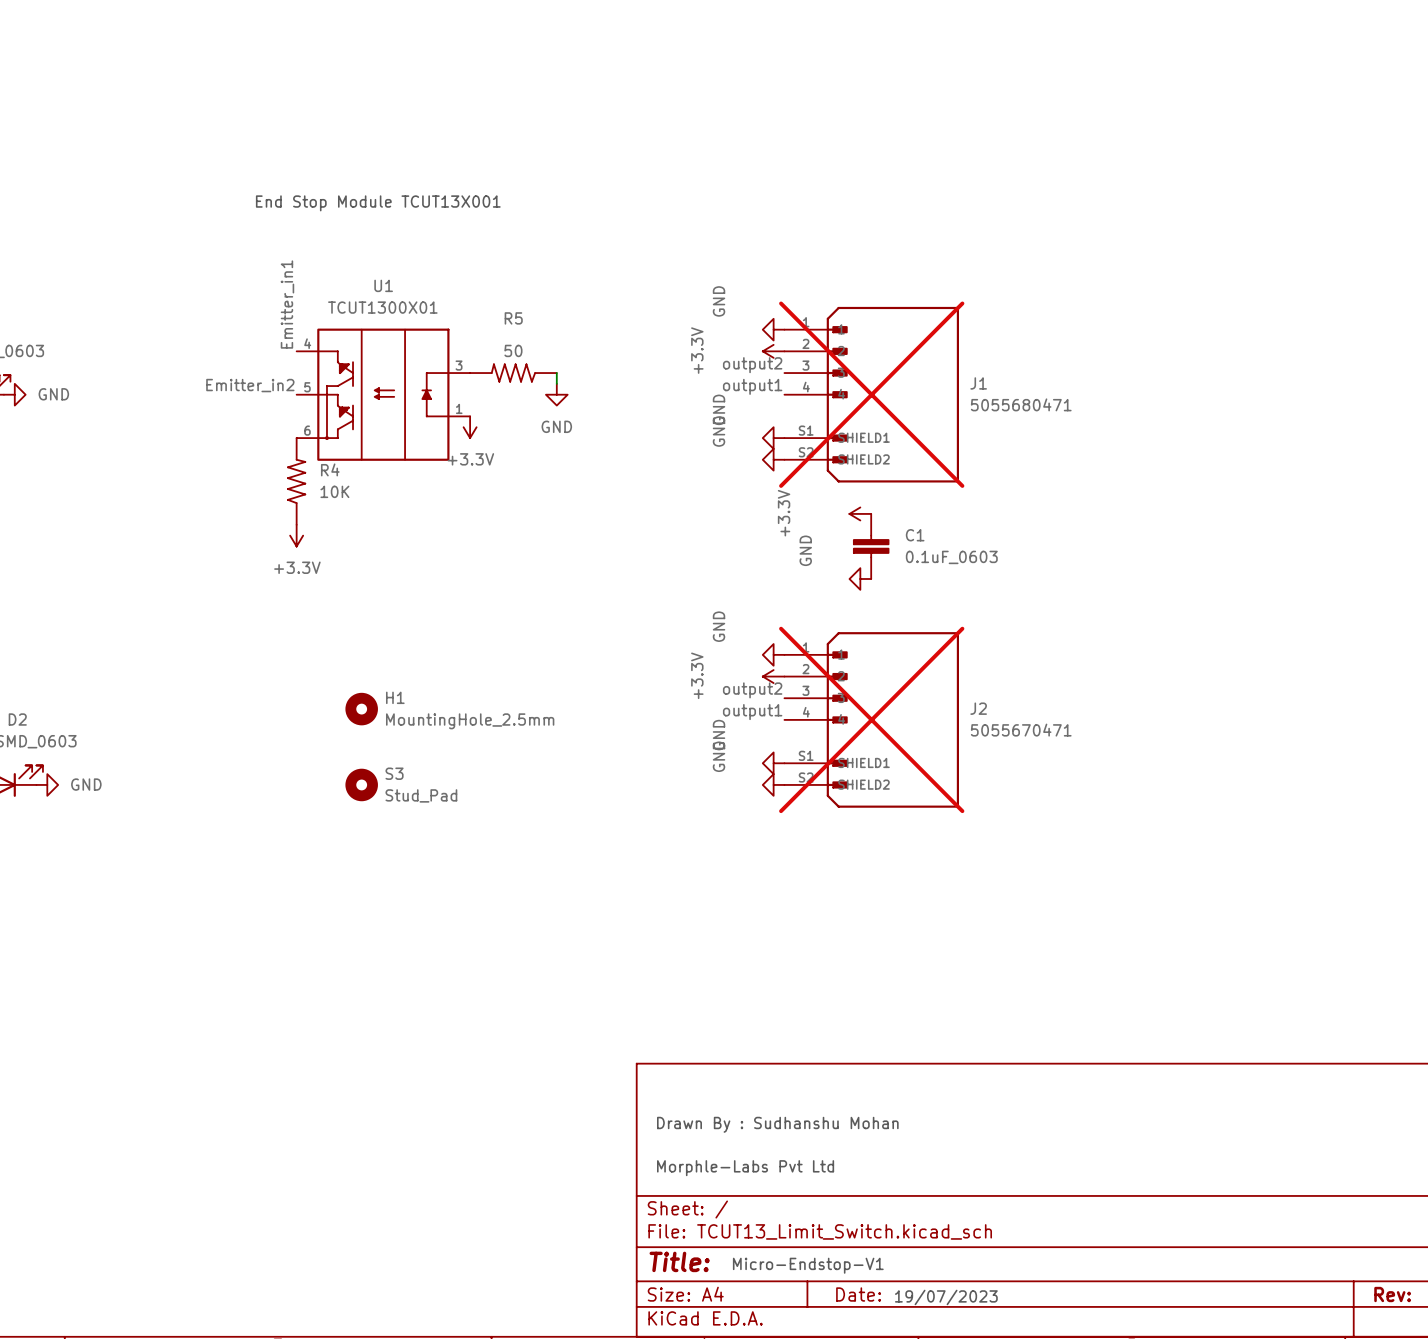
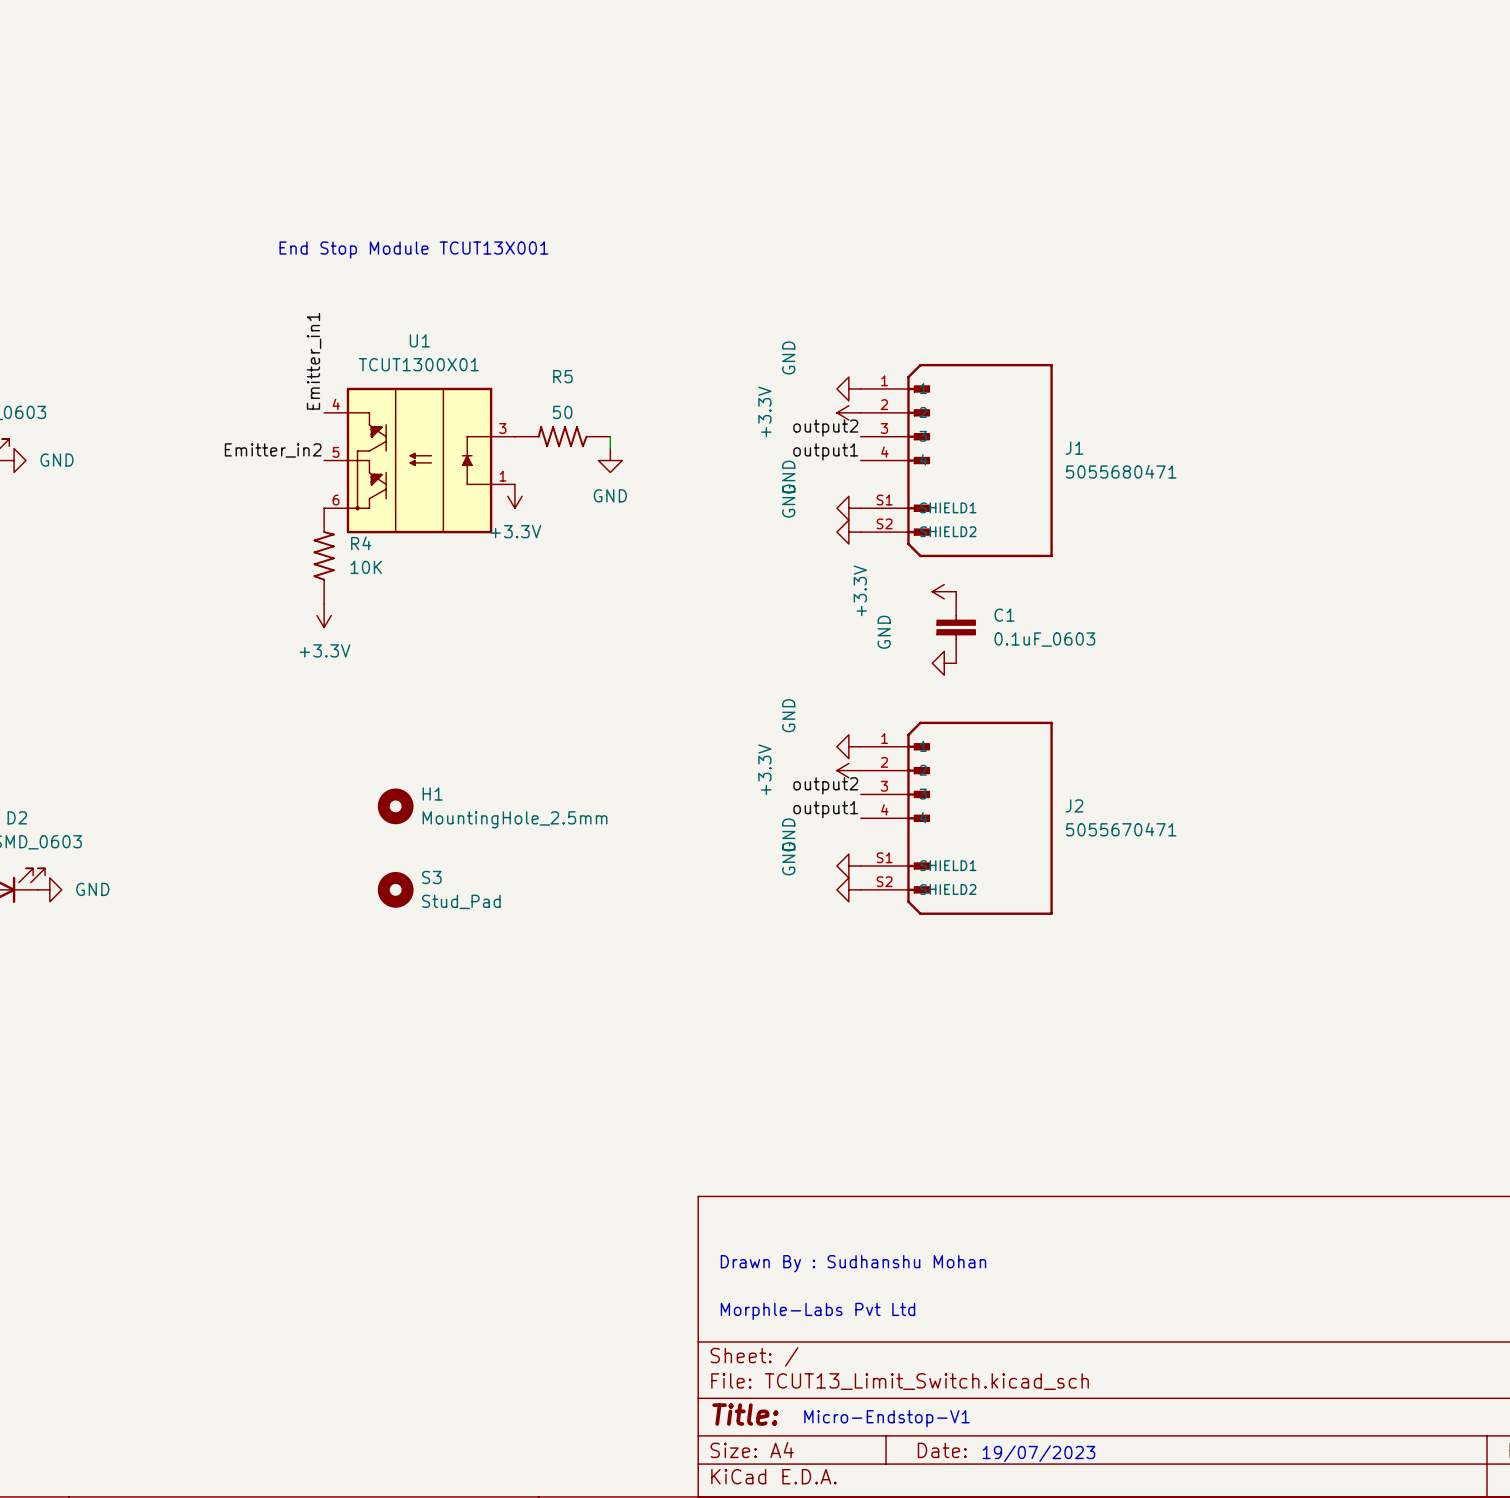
J1 do-not-place cross: (871, 394) -> none
J2 do-not-place cross: (871, 719) -> none

